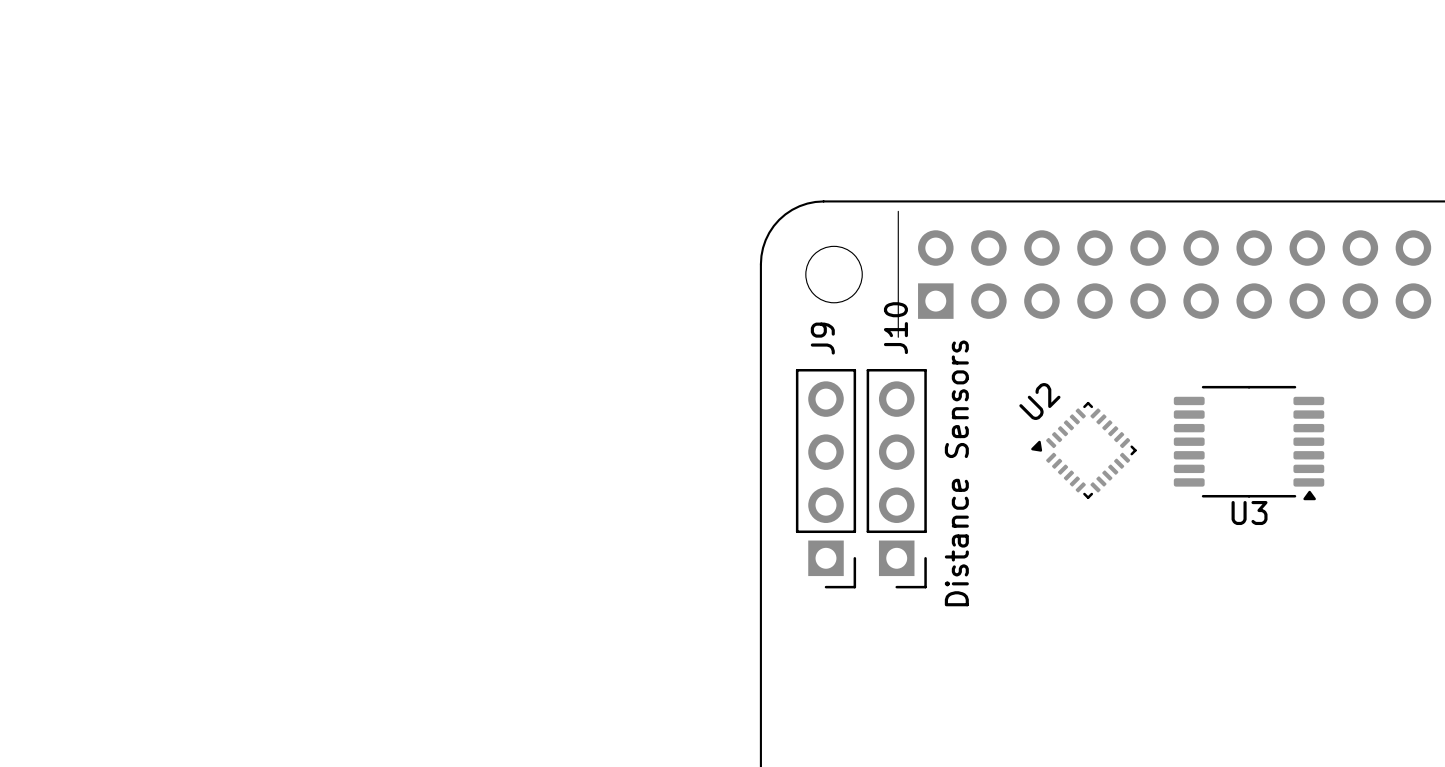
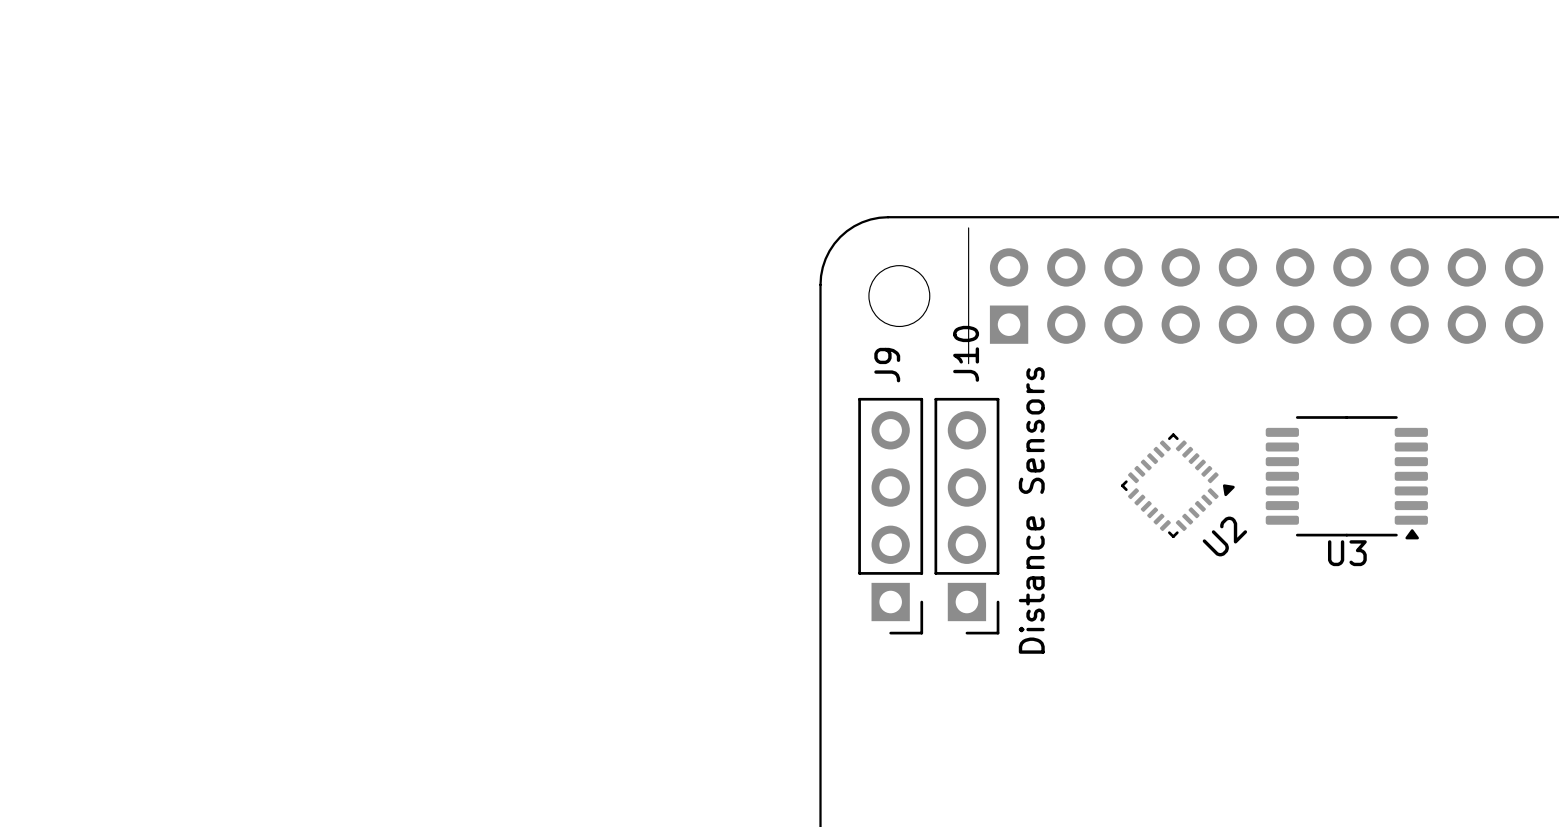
U2 rotation: 0° (1083, 450) -> 180° (1177, 485)

